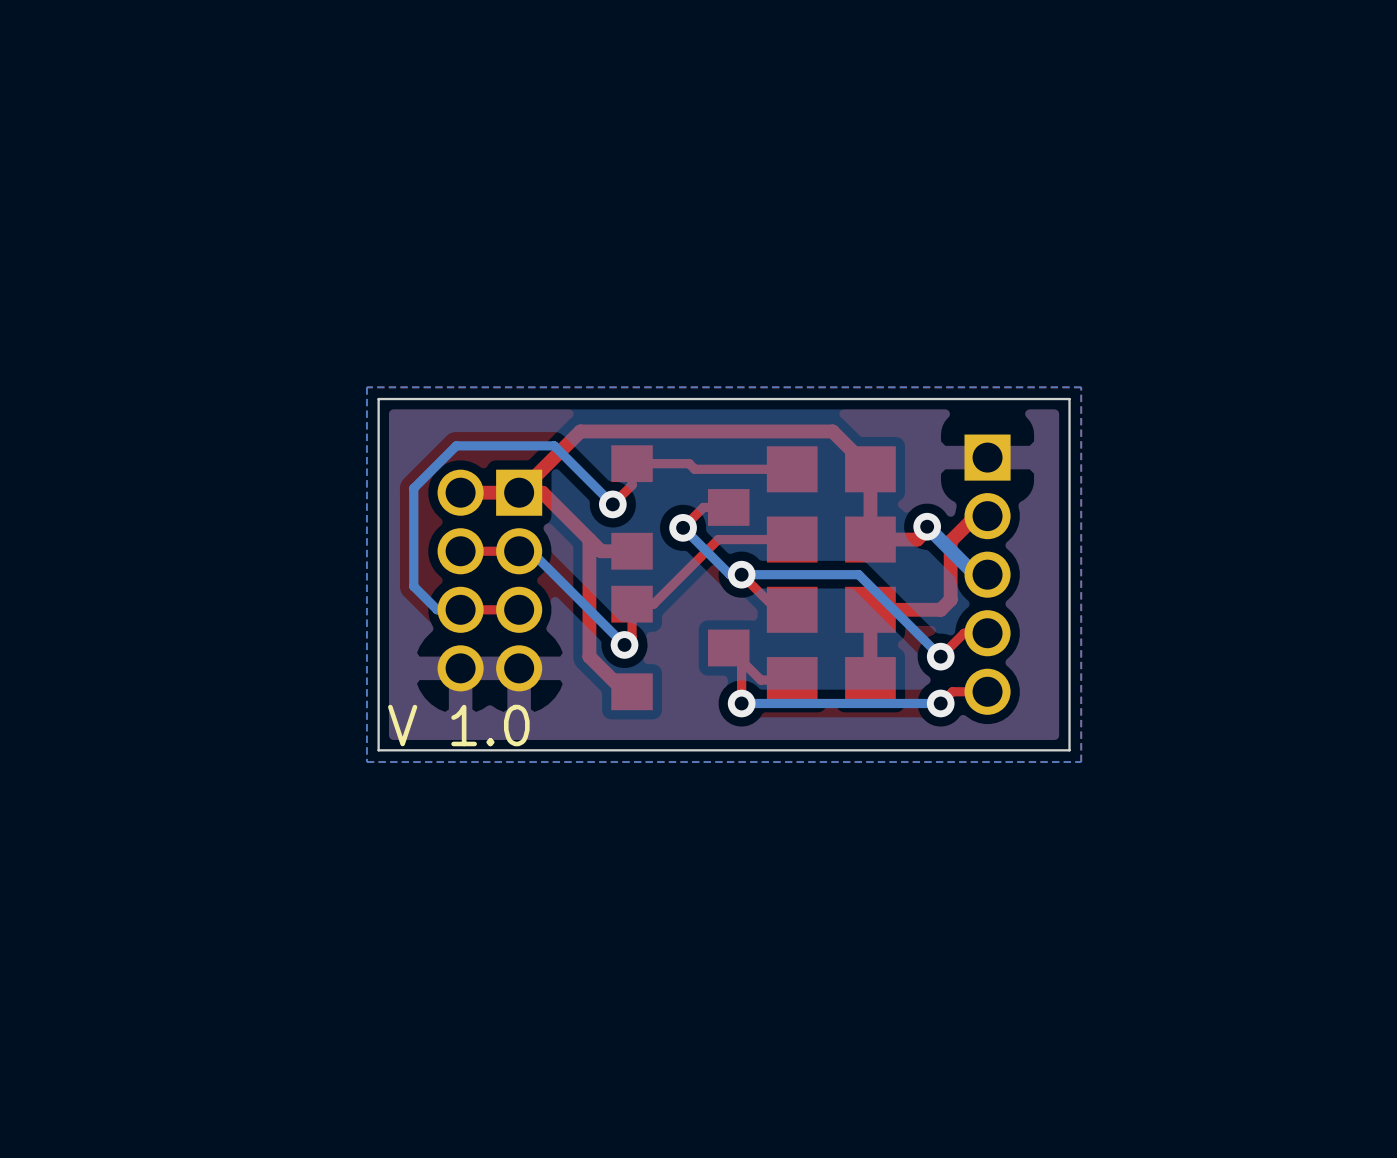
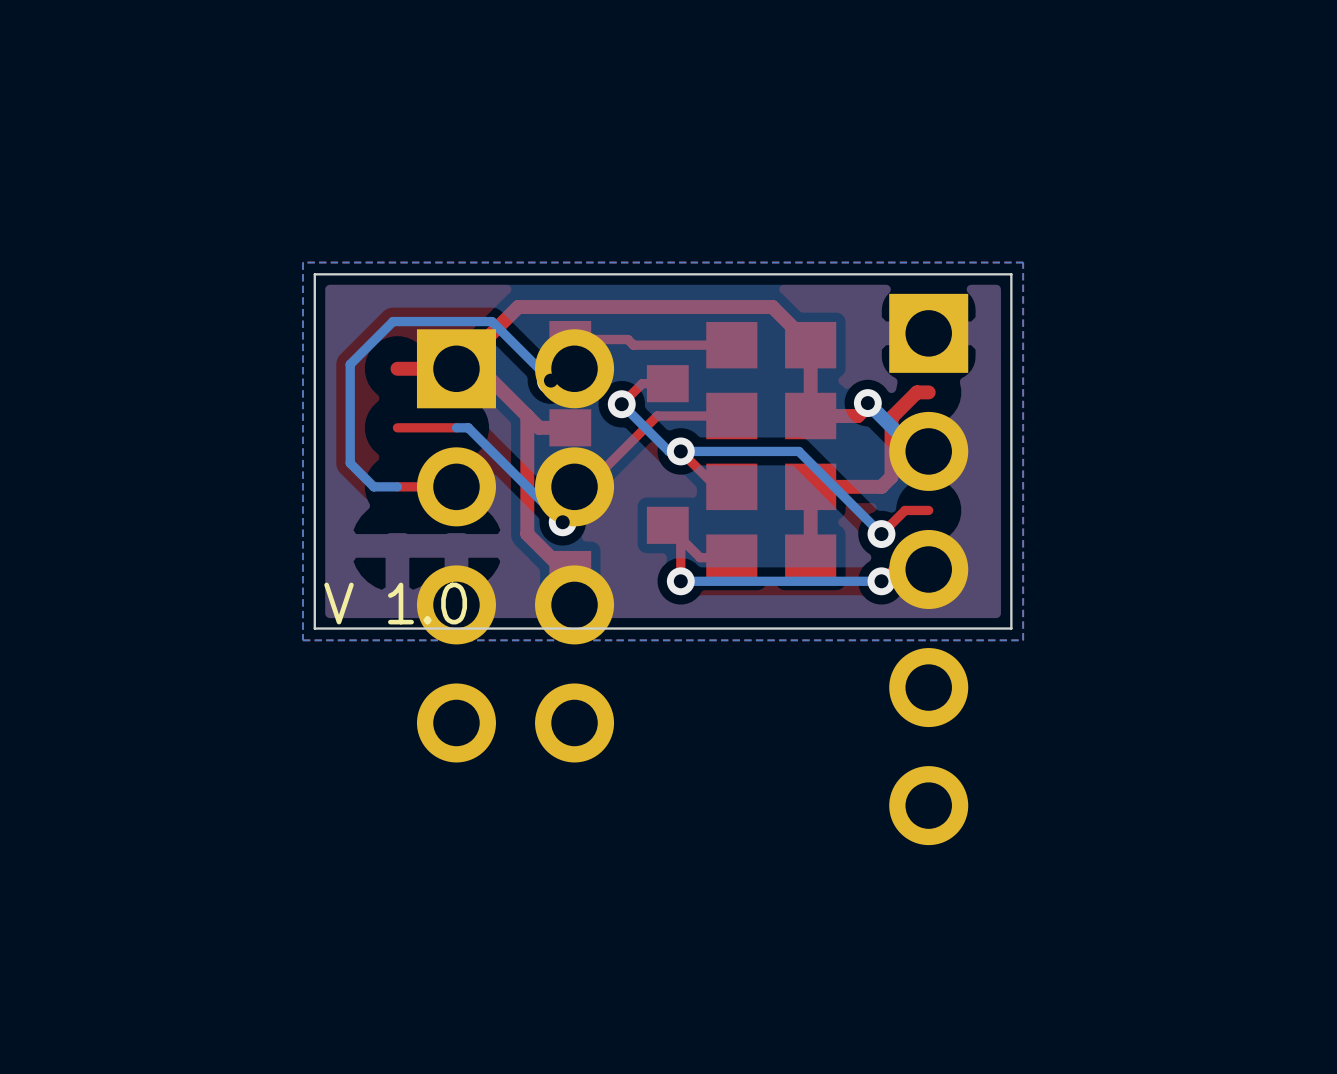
part: (987, 574) -> none
part: (489, 580) -> none
part: none -> (515, 545)
part: none -> (928, 569)

